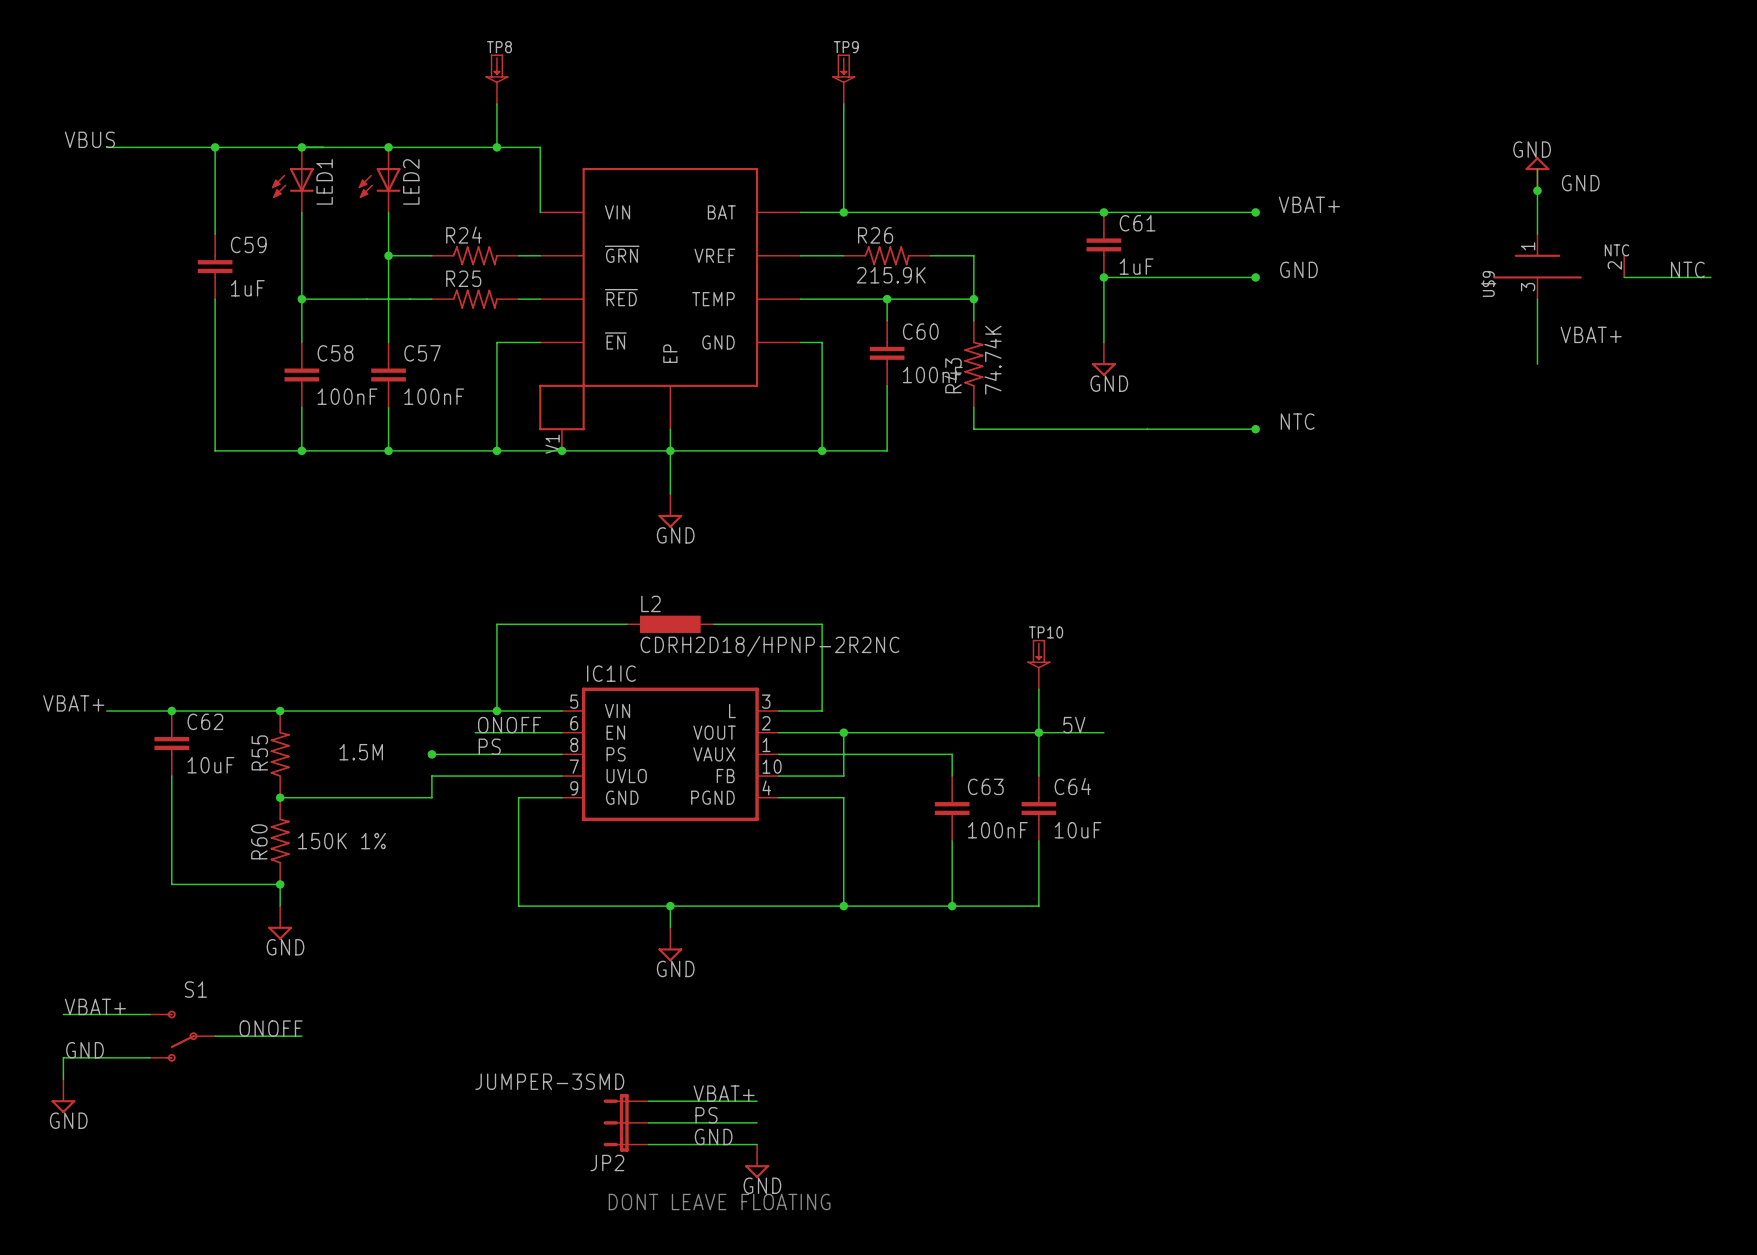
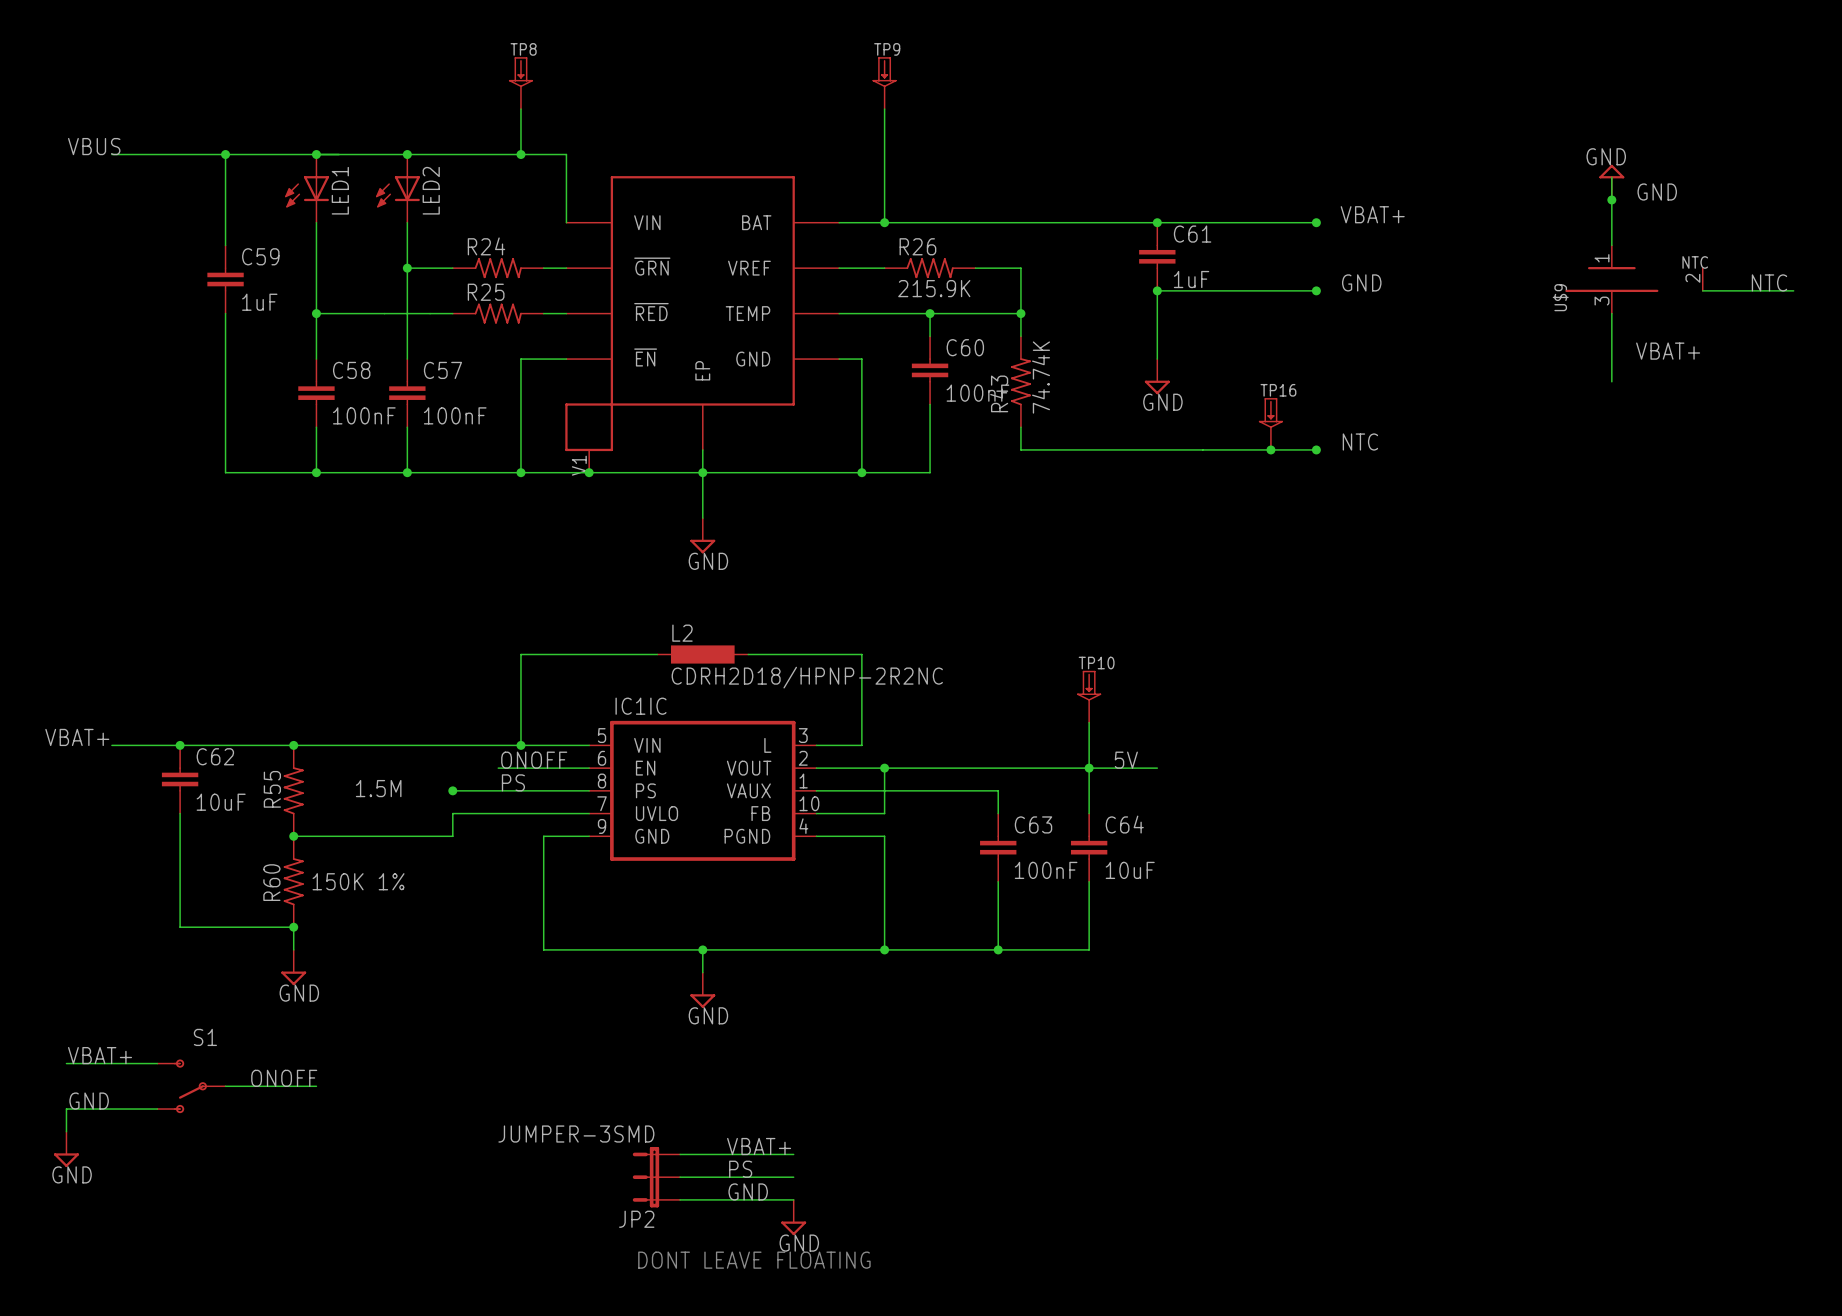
TP16: none -> (1270, 424)
junction: none -> (1270, 449)

